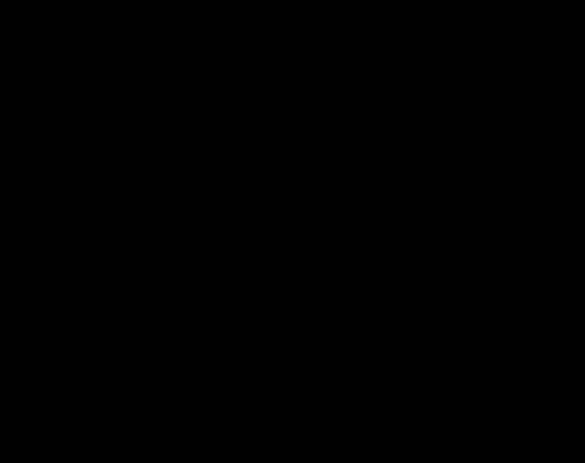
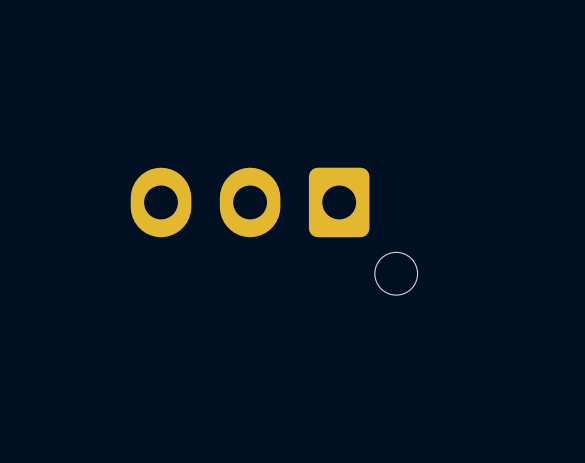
part: none -> (274, 231)

